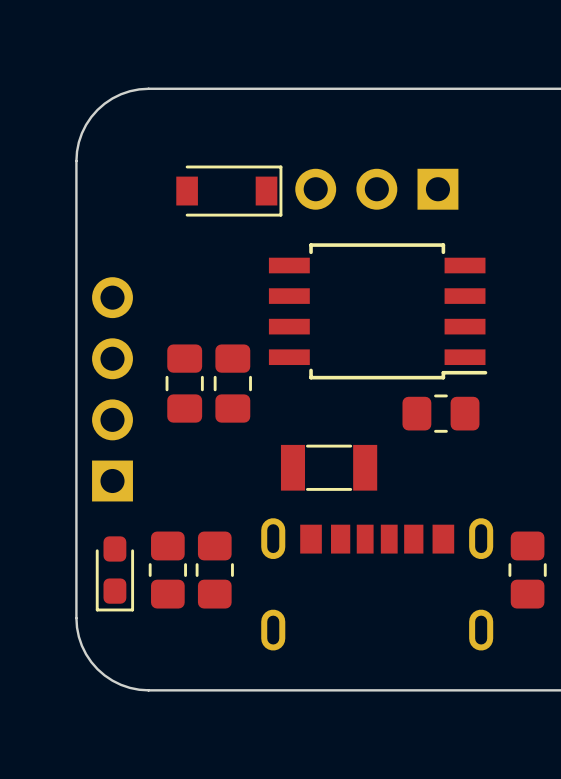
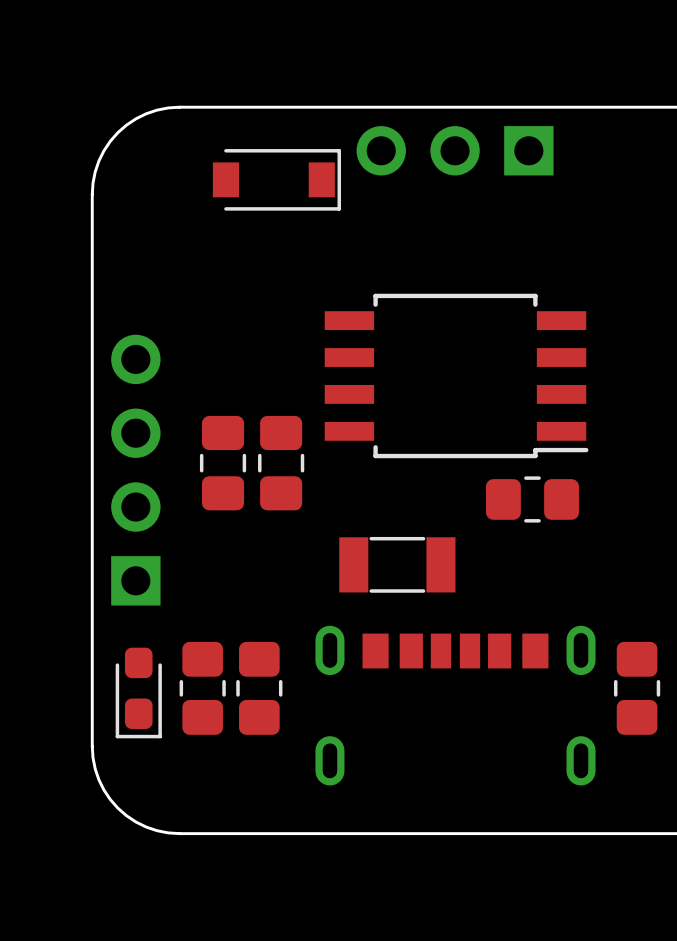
part position: (376, 189) -> (455, 150)
part position: (229, 191) -> (276, 179)

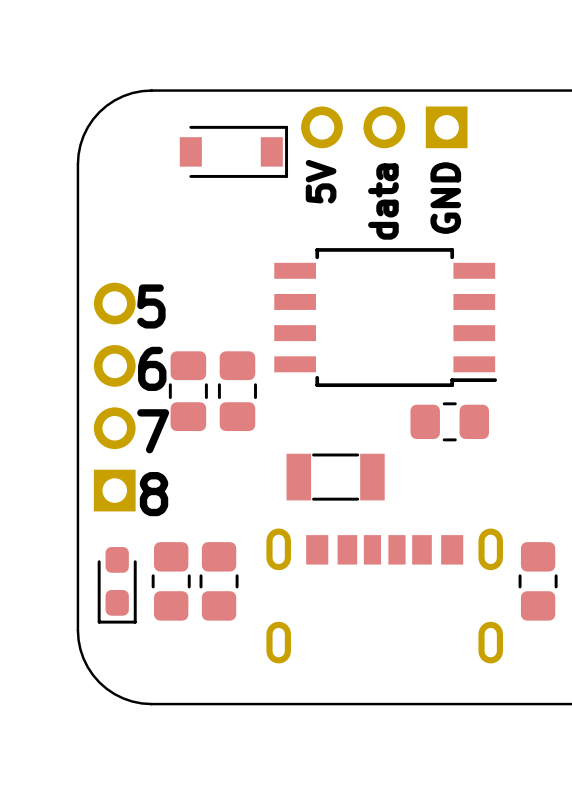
text: none -> 5V (321, 181)
text: none -> GND (445, 198)
text: none -> data (383, 201)
text: none -> 5 (151, 306)
text: none -> 6 (152, 368)
text: none -> 7 (153, 431)
text: none -> 8 (154, 494)

